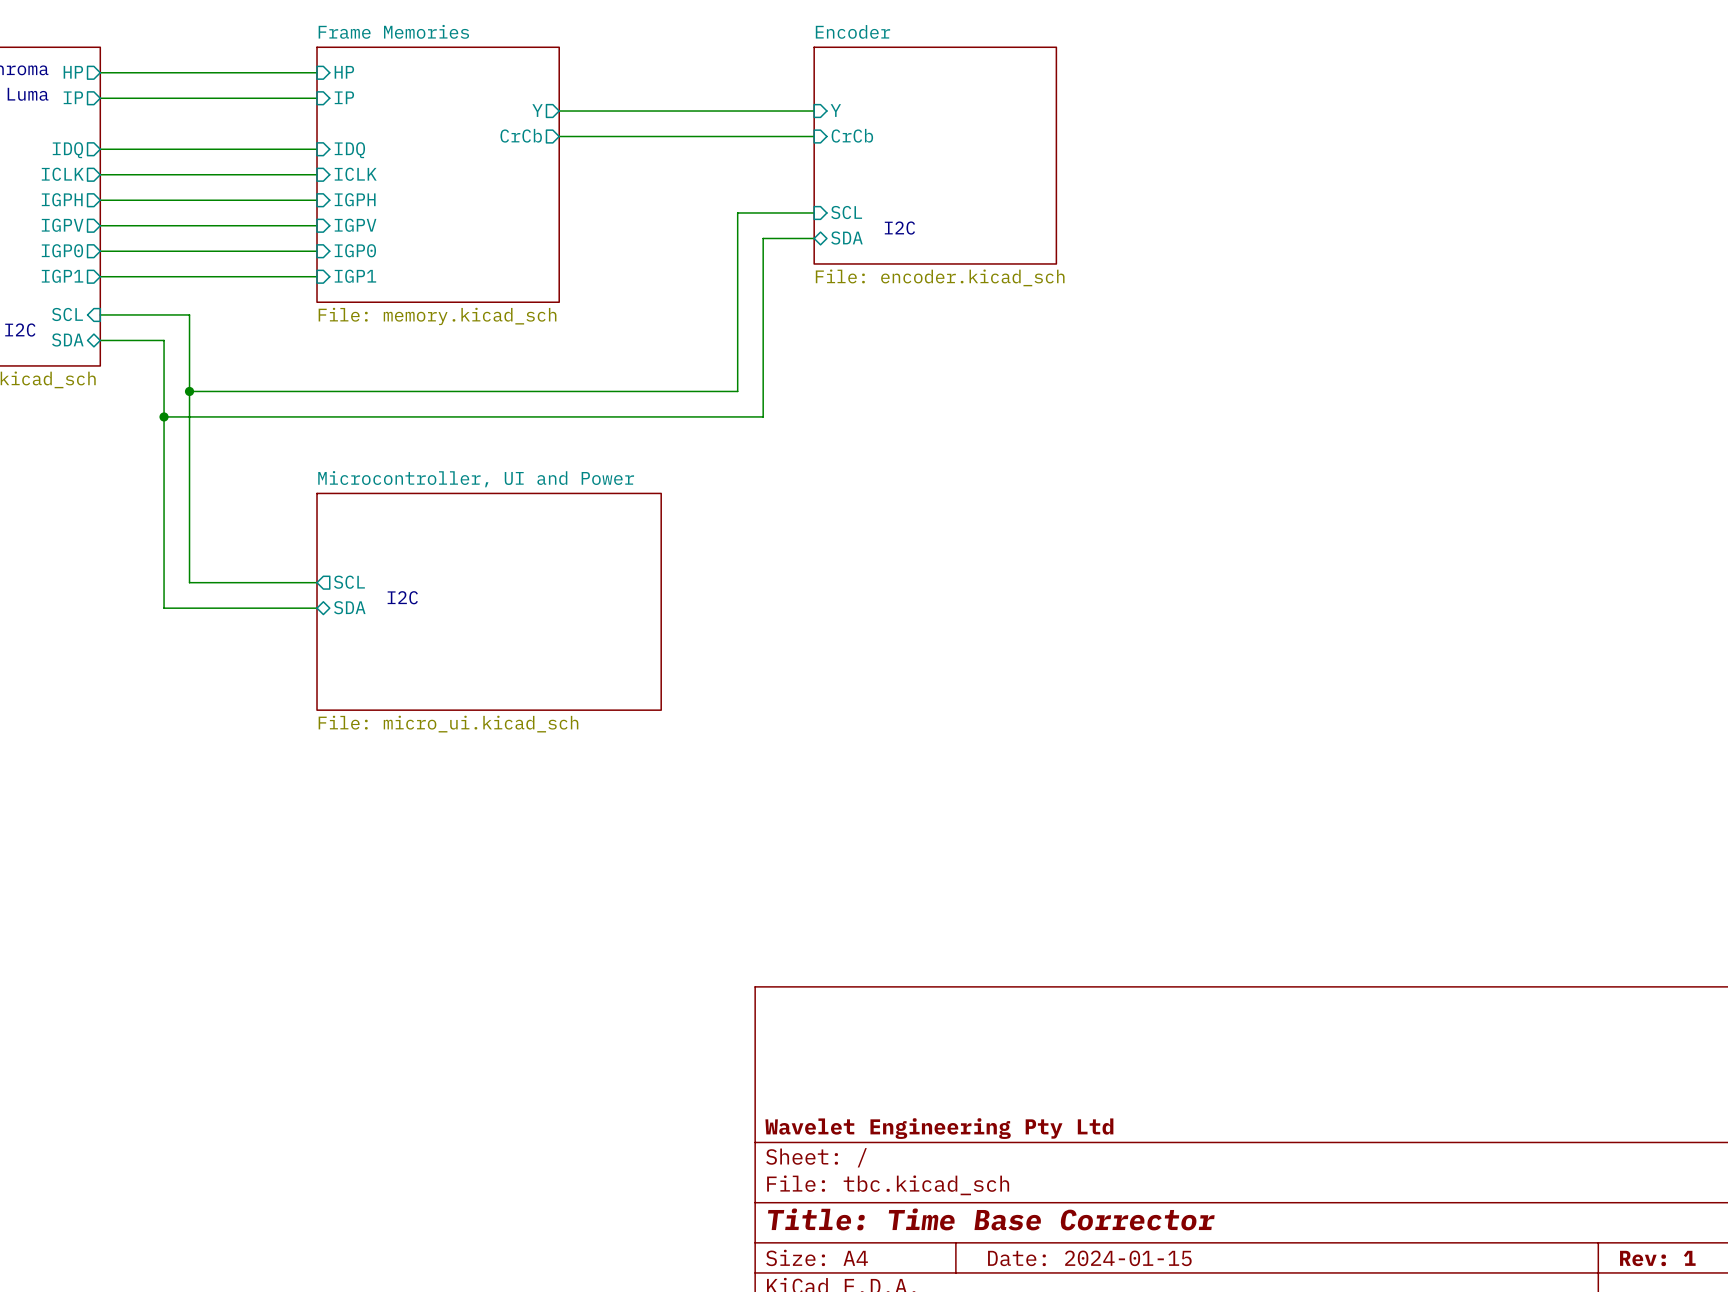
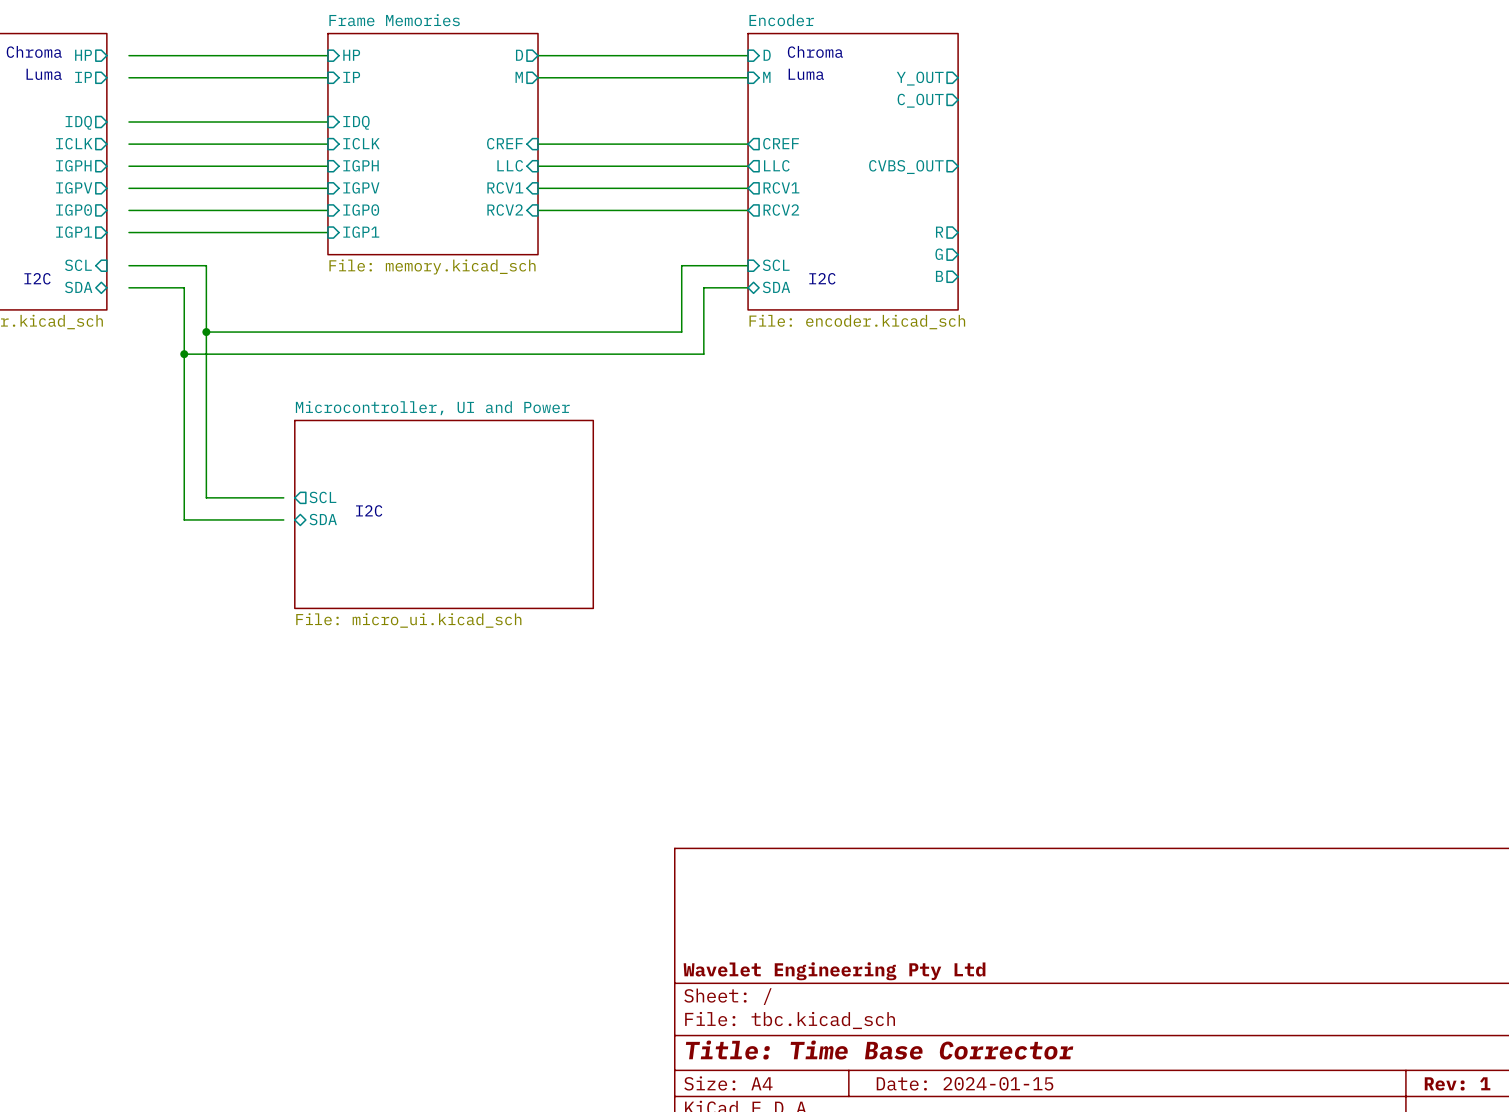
text: none -> Chroma (815, 51)
wire: (100, 72) (125, 72) -> none
sheet pin position: HP (344, 72) -> HP (351, 55)
sheet pin: none -> D (519, 55)
wire: none -> (538, 55) (748, 55)
sheet pin: none -> D (767, 55)
text: none -> Luma (806, 74)
sheet pin position: IP (344, 97) -> IP (351, 77)
sheet pin: none -> M (519, 77)
sheet pin: none -> M (766, 77)
wire: (100, 98) (125, 98) -> none
wire: none -> (294, 77) (327, 77)
wire: none -> (538, 77) (748, 77)
sheet pin: none -> Y_OUT (920, 78)
sheet pin: Y (537, 110) -> none
sheet pin: Y (835, 110) -> none
wire: (559, 111) (814, 111) -> none
sheet pin: none -> C_OUT (920, 100)
sheet pin: CrCb (521, 135) -> none
sheet pin: CrCb (852, 135) -> none
wire: (559, 136) (814, 136) -> none
wire: (100, 149) (125, 149) -> none
wire: none -> (294, 122) (327, 122)
sheet pin position: IDQ (349, 150) -> IDQ (356, 122)
sheet Encoder: File: encoder.kicad_sch (935, 155) -> none
wire: (100, 174) (125, 174) -> none
wire: none -> (294, 144) (327, 144)
sheet pin position: ICLK (355, 174) -> ICLK (361, 143)
sheet Frame Memories position: (438, 174) -> (432, 144)
sheet pin: none -> CREF (504, 143)
wire: none -> (538, 144) (748, 144)
sheet pin: none -> CREF (781, 143)
sheet pin position: IGPH (355, 199) -> IGPH (361, 165)
sheet pin: none -> LLC (510, 165)
sheet pin: none -> LLC (776, 165)
wire: (100, 200) (125, 200) -> none
wire: none -> (294, 166) (327, 166)
wire: none -> (538, 166) (748, 166)
sheet pin: none -> CVBS_OUT (906, 167)
sheet Encoder: none -> File: encoder.kicad_sch (853, 171)
wire: (814, 212) (737, 212) (737, 391) -> none
sheet pin position: SCL (846, 212) -> SCL (776, 265)
wire: (100, 225) (125, 225) -> none
wire: none -> (294, 188) (327, 188)
sheet pin position: IGPV (355, 225) -> IGPV (361, 187)
sheet pin: none -> RCV1 (505, 187)
wire: none -> (538, 188) (748, 188)
sheet pin: none -> RCV1 (781, 187)
text position: I2C (899, 228) -> I2C (822, 278)
wire: (814, 238) (763, 238) (763, 314) -> (748, 265) (681, 265)
sheet pin position: SDA (846, 238) -> SDA (776, 287)
sheet pin position: IGP0 (355, 250) -> IGP0 (361, 210)
sheet pin: none -> RCV2 (505, 210)
sheet pin: none -> RCV2 (781, 210)
wire: (100, 251) (125, 251) -> none
wire: none -> (294, 210) (327, 210)
wire: none -> (538, 210) (748, 210)
wire: (100, 276) (125, 276) -> none
wire: none -> (294, 232) (327, 232)
sheet pin position: IGP1 (355, 276) -> IGP1 (361, 232)
sheet pin: none -> R (939, 232)
sheet pin: none -> G (939, 254)
wire: (100, 314) (125, 314) -> none
wire: (189, 314) (189, 340) -> (162, 287) (184, 287)
wire: none -> (184, 265) (206, 265) (206, 497)
sheet pin: none -> B (939, 276)
wire: (100, 340) (125, 340) -> none
wire: (164, 340) (164, 608) (189, 608) -> none
wire: none -> (748, 287) (703, 287) (703, 354) (681, 354)
wire: (189, 391) (215, 391) -> none
junction: (189, 391) -> none
junction: none -> (206, 332)
wire: (763, 391) (763, 416) -> (681, 332) (659, 332)
wire: (164, 416) (189, 416) -> none
junction: (164, 416) -> none
junction: none -> (184, 354)
wire: (189, 582) (215, 582) -> (184, 497) (184, 519)
wire: (304, 582) (317, 582) -> none
wire: (304, 608) (317, 608) -> none

